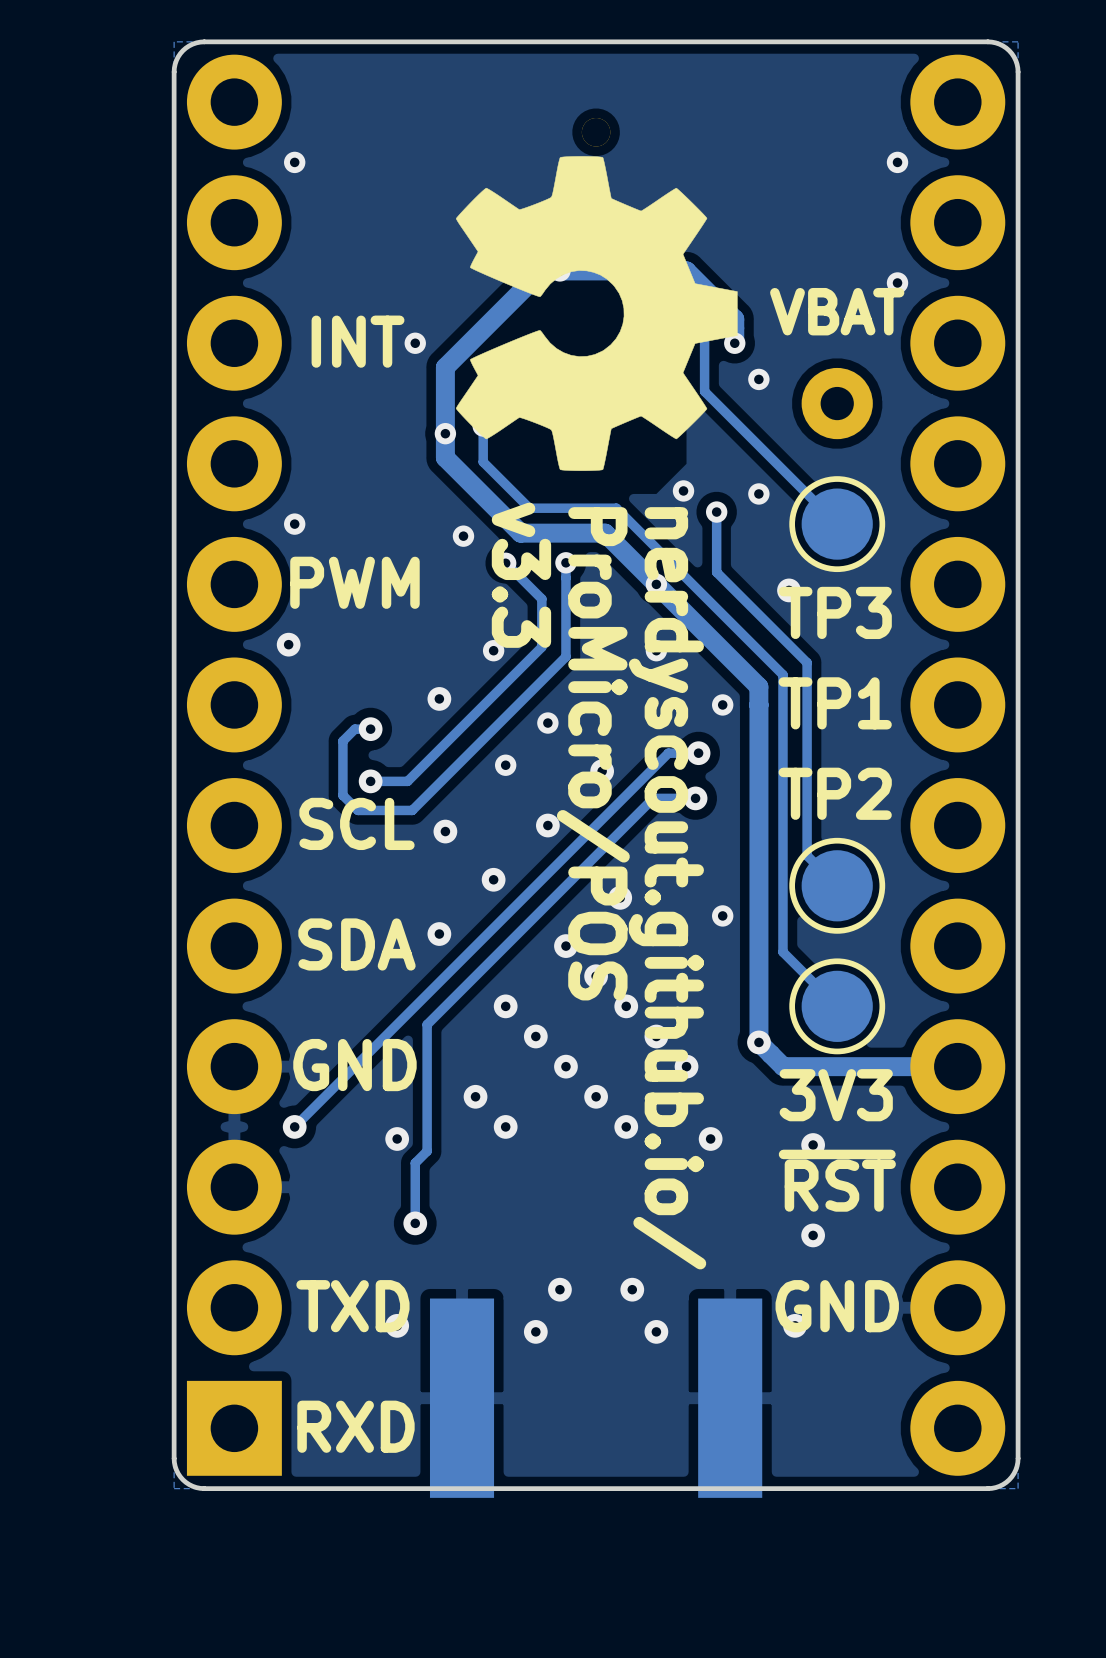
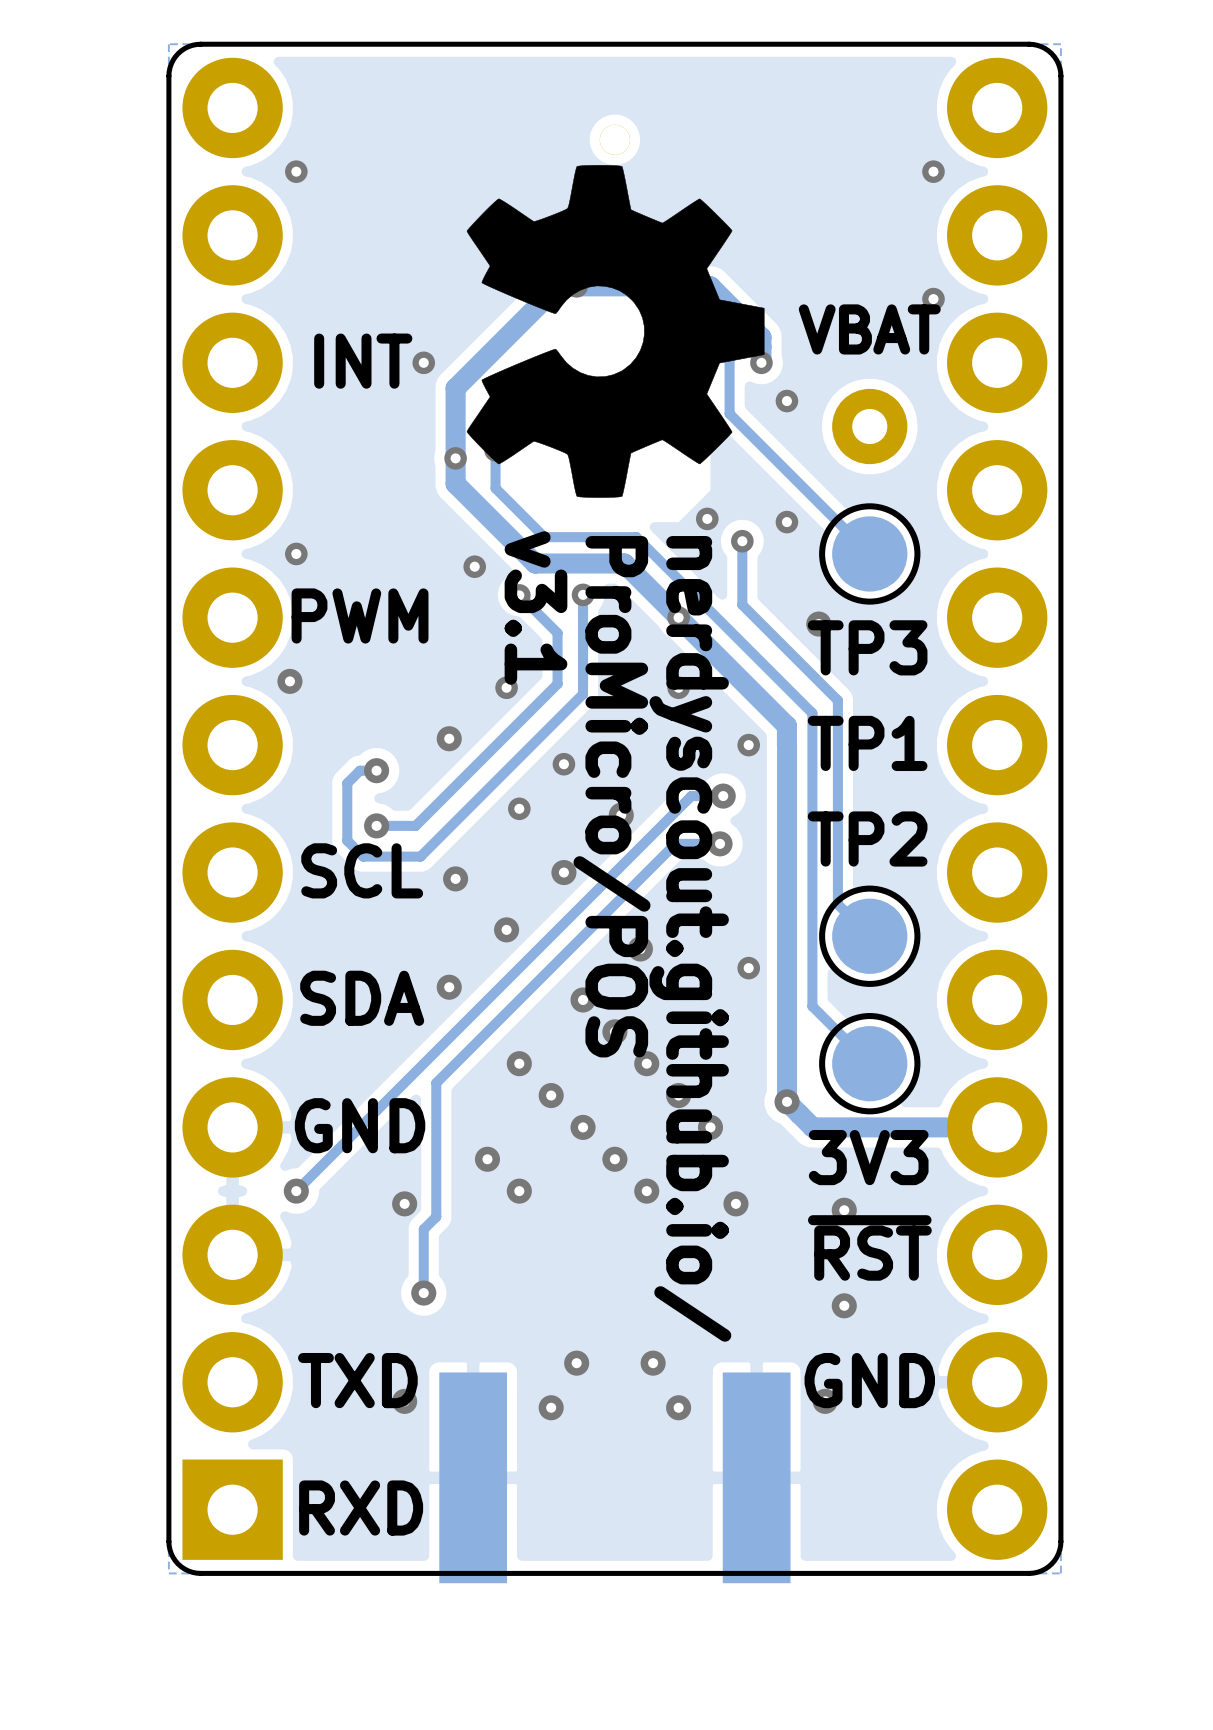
text: v3.3 (521, 575) -> v3.1 (536, 608)

